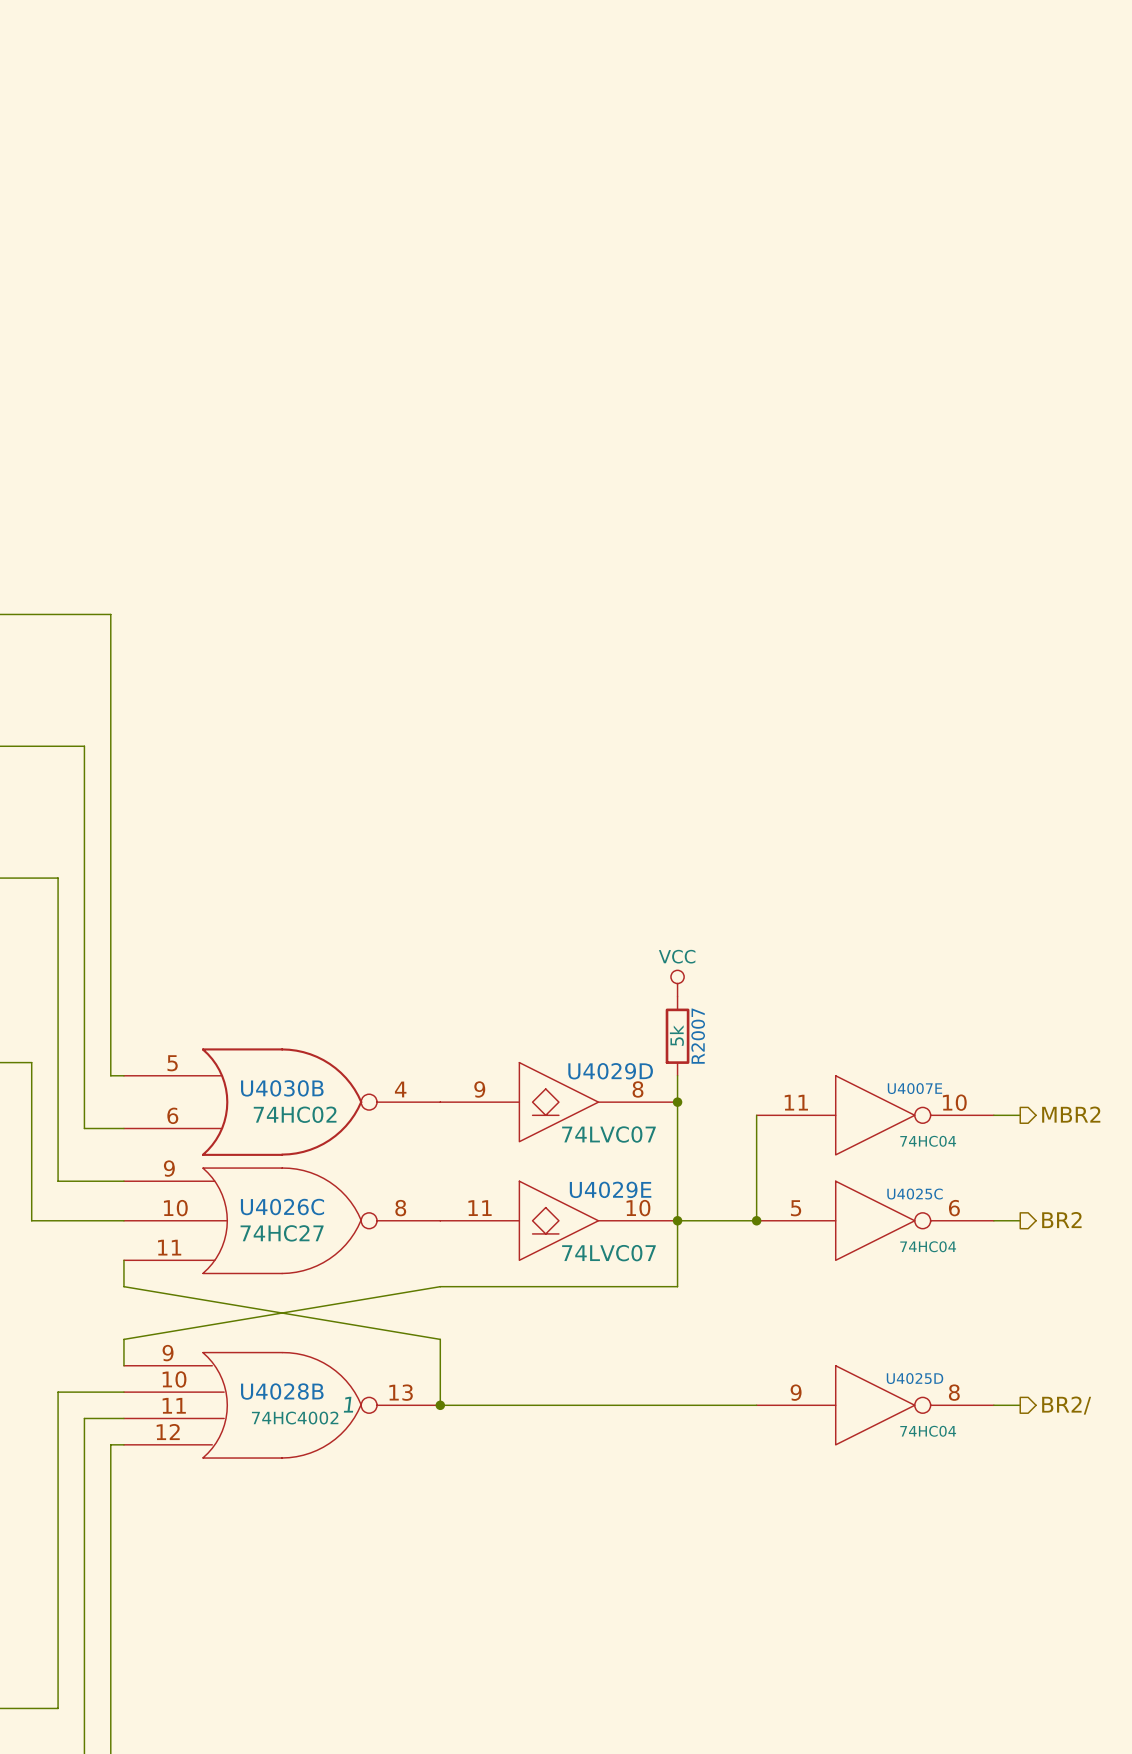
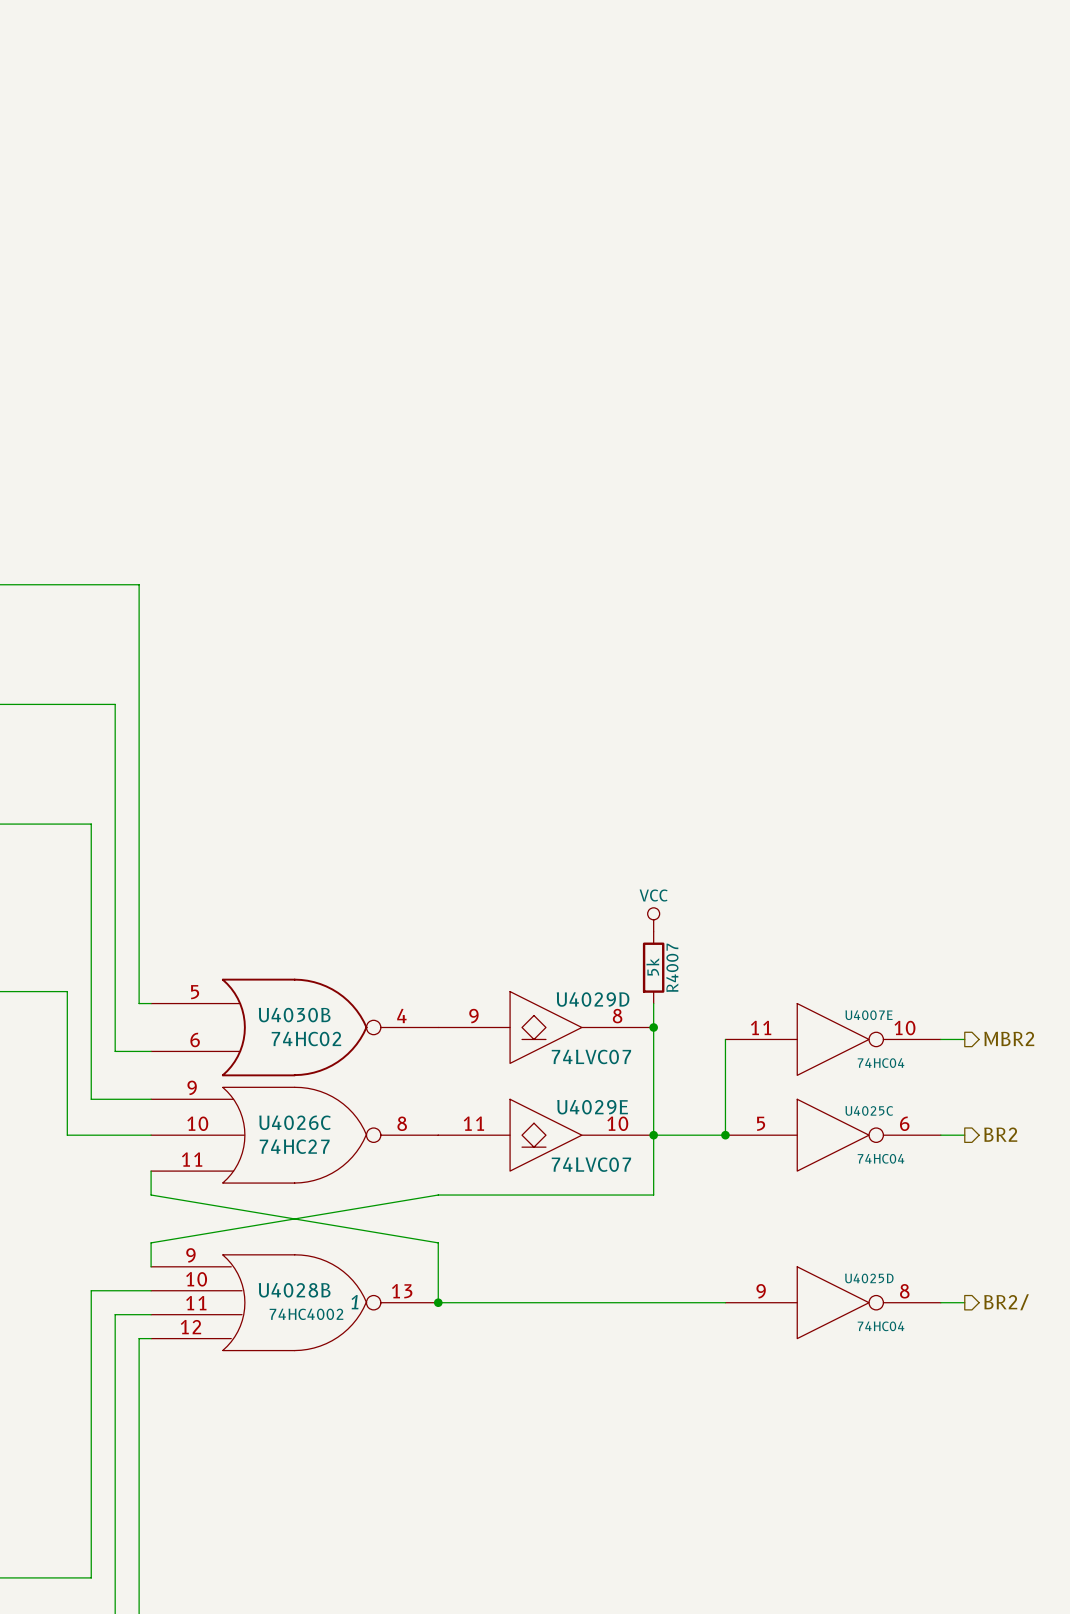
R2007 name: R2007 (698, 1036) -> R4007 (672, 967)

